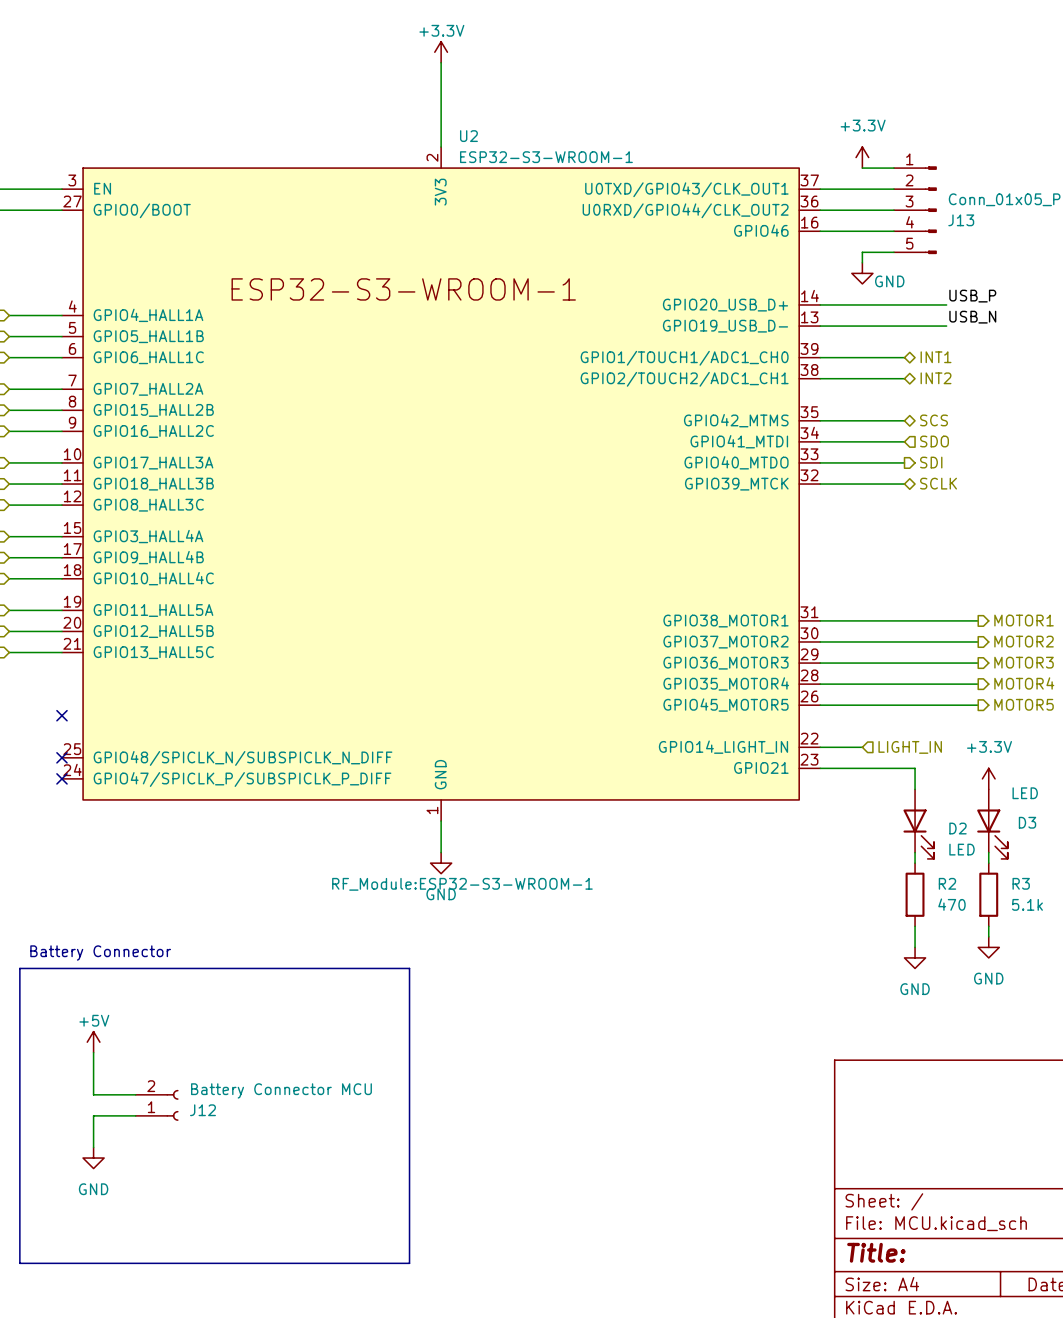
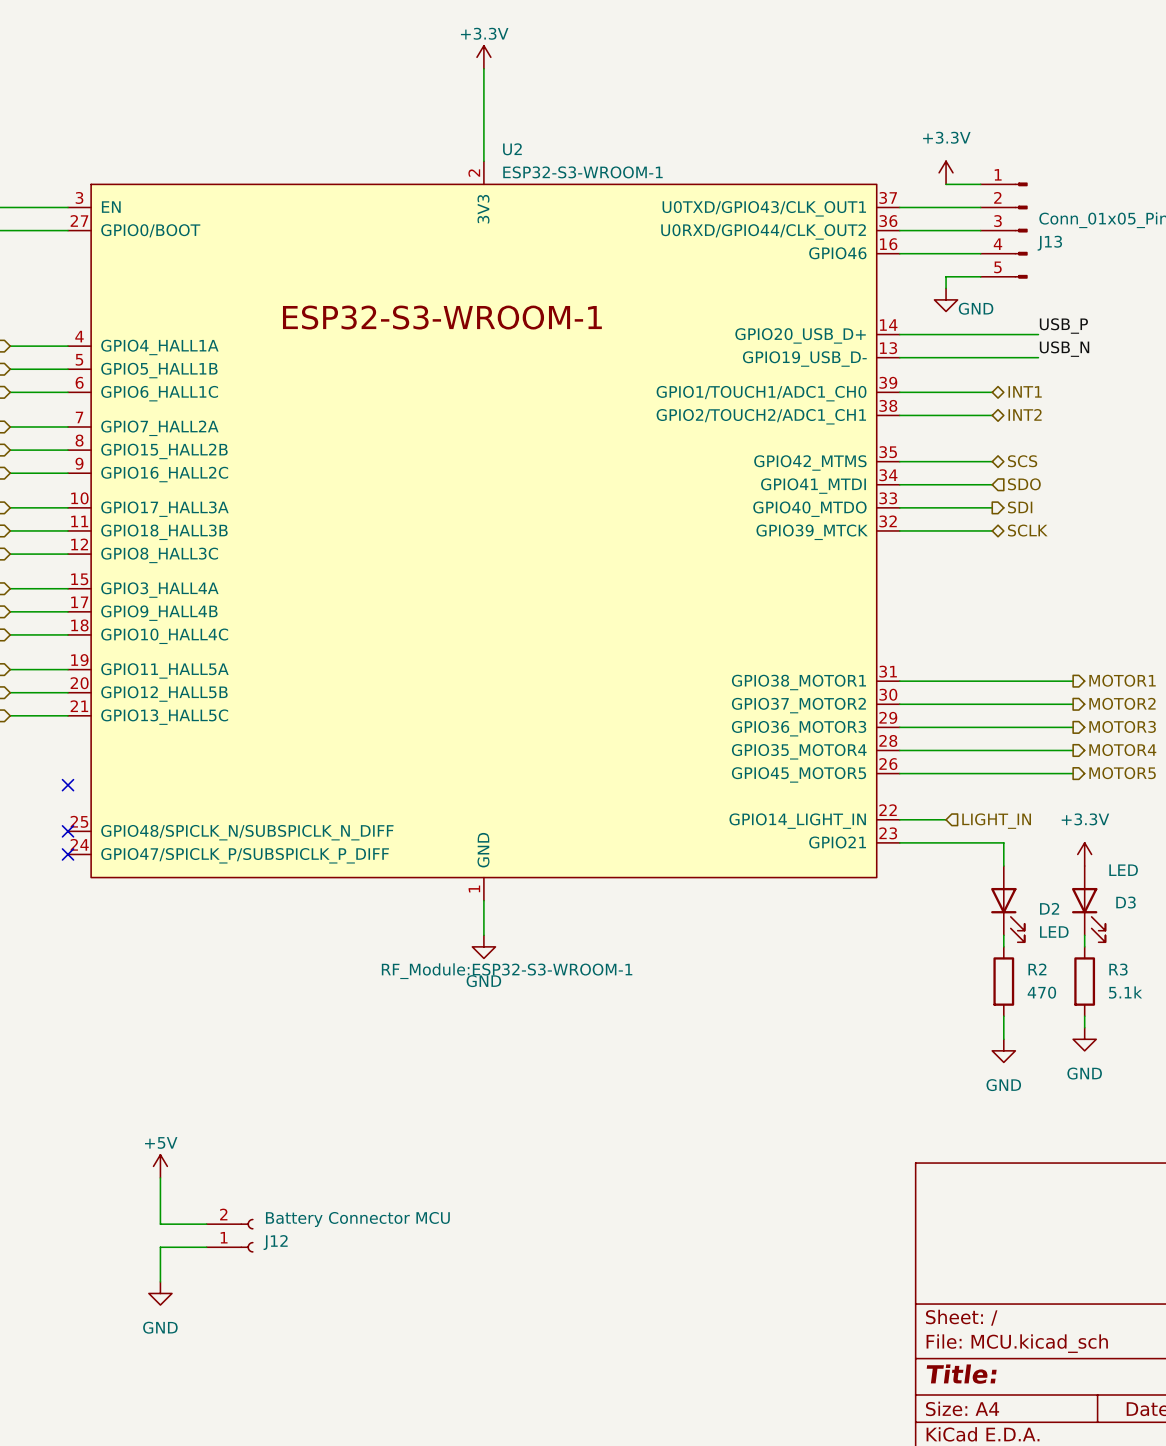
text: Battery Connector (100, 953) -> none
line: (19, 968) (409, 968) (409, 1263) (19, 1263) (19, 968) -> none
power symbol position: +5V (93, 1042) -> +5V (160, 1166)
wire: (93, 1052) (93, 1094) (135, 1094) -> (160, 1177) (160, 1224) (206, 1224)
J12 position: (157, 1105) -> (230, 1235)
wire: (135, 1115) (93, 1115) (93, 1147) -> (206, 1247) (160, 1247) (160, 1281)
power symbol position: GND (93, 1158) -> GND (160, 1293)

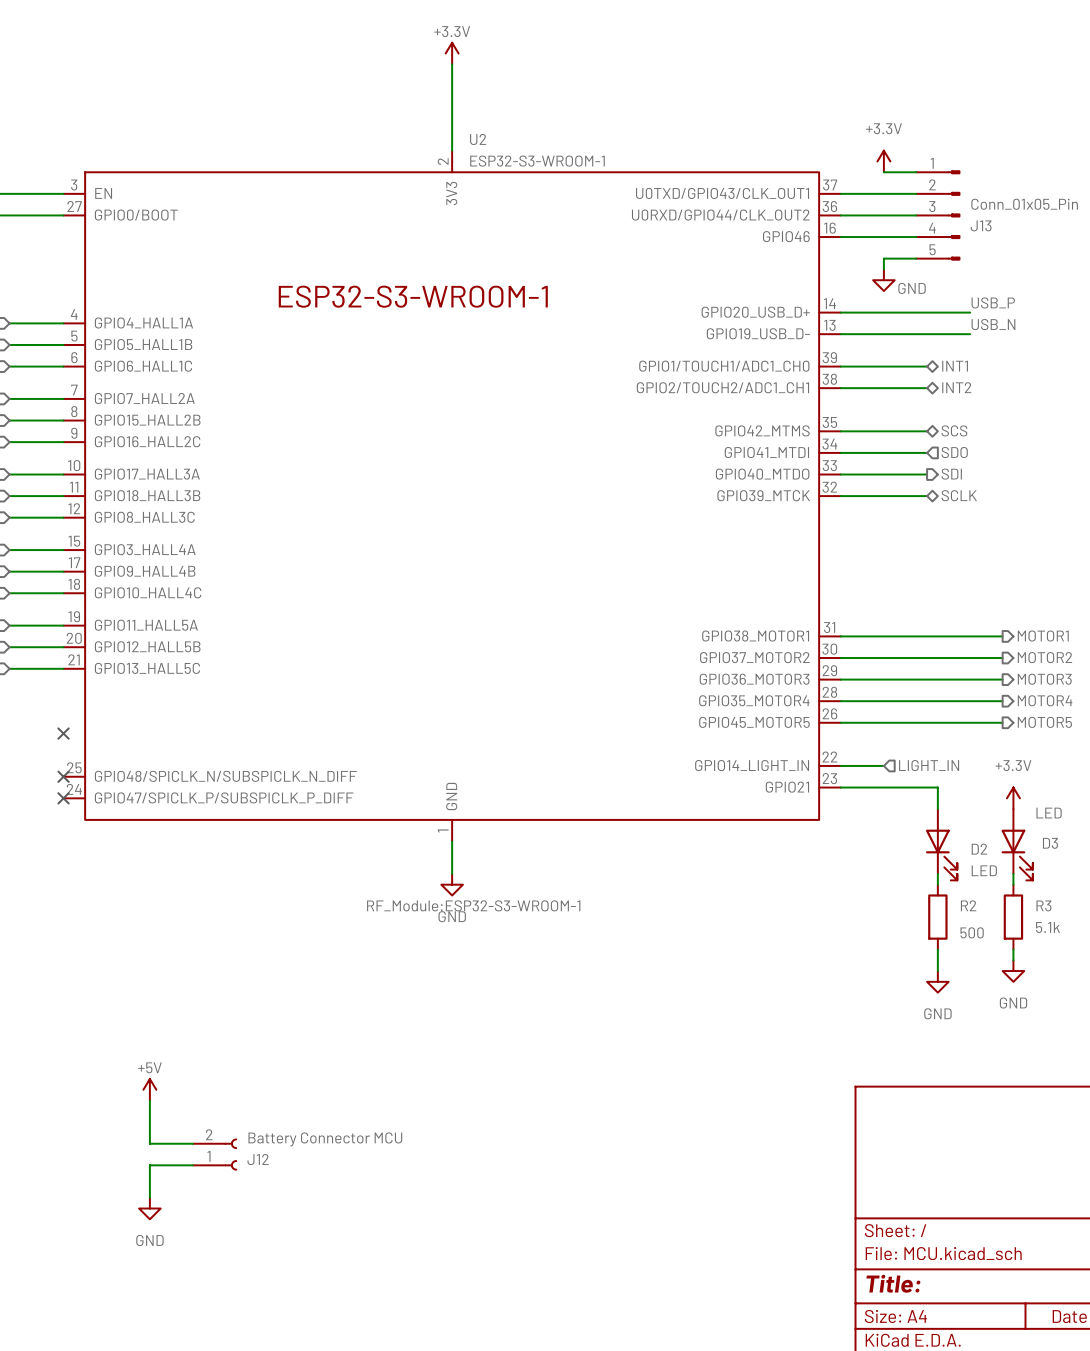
R2 value: 470 (1041, 992) -> 500 (972, 932)

